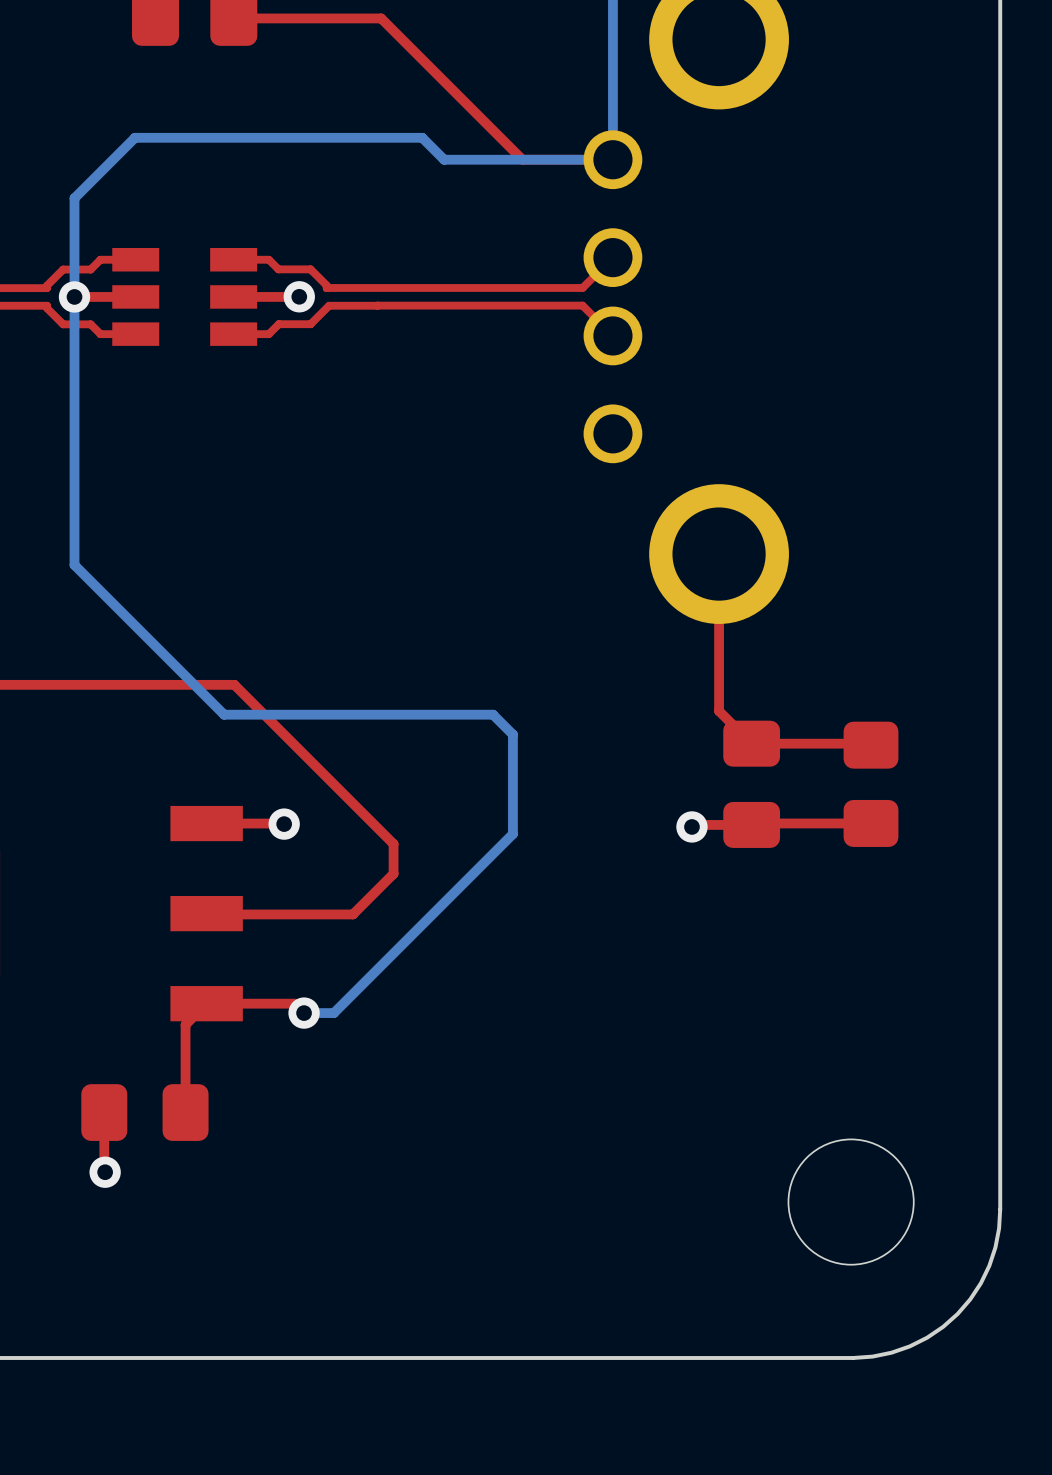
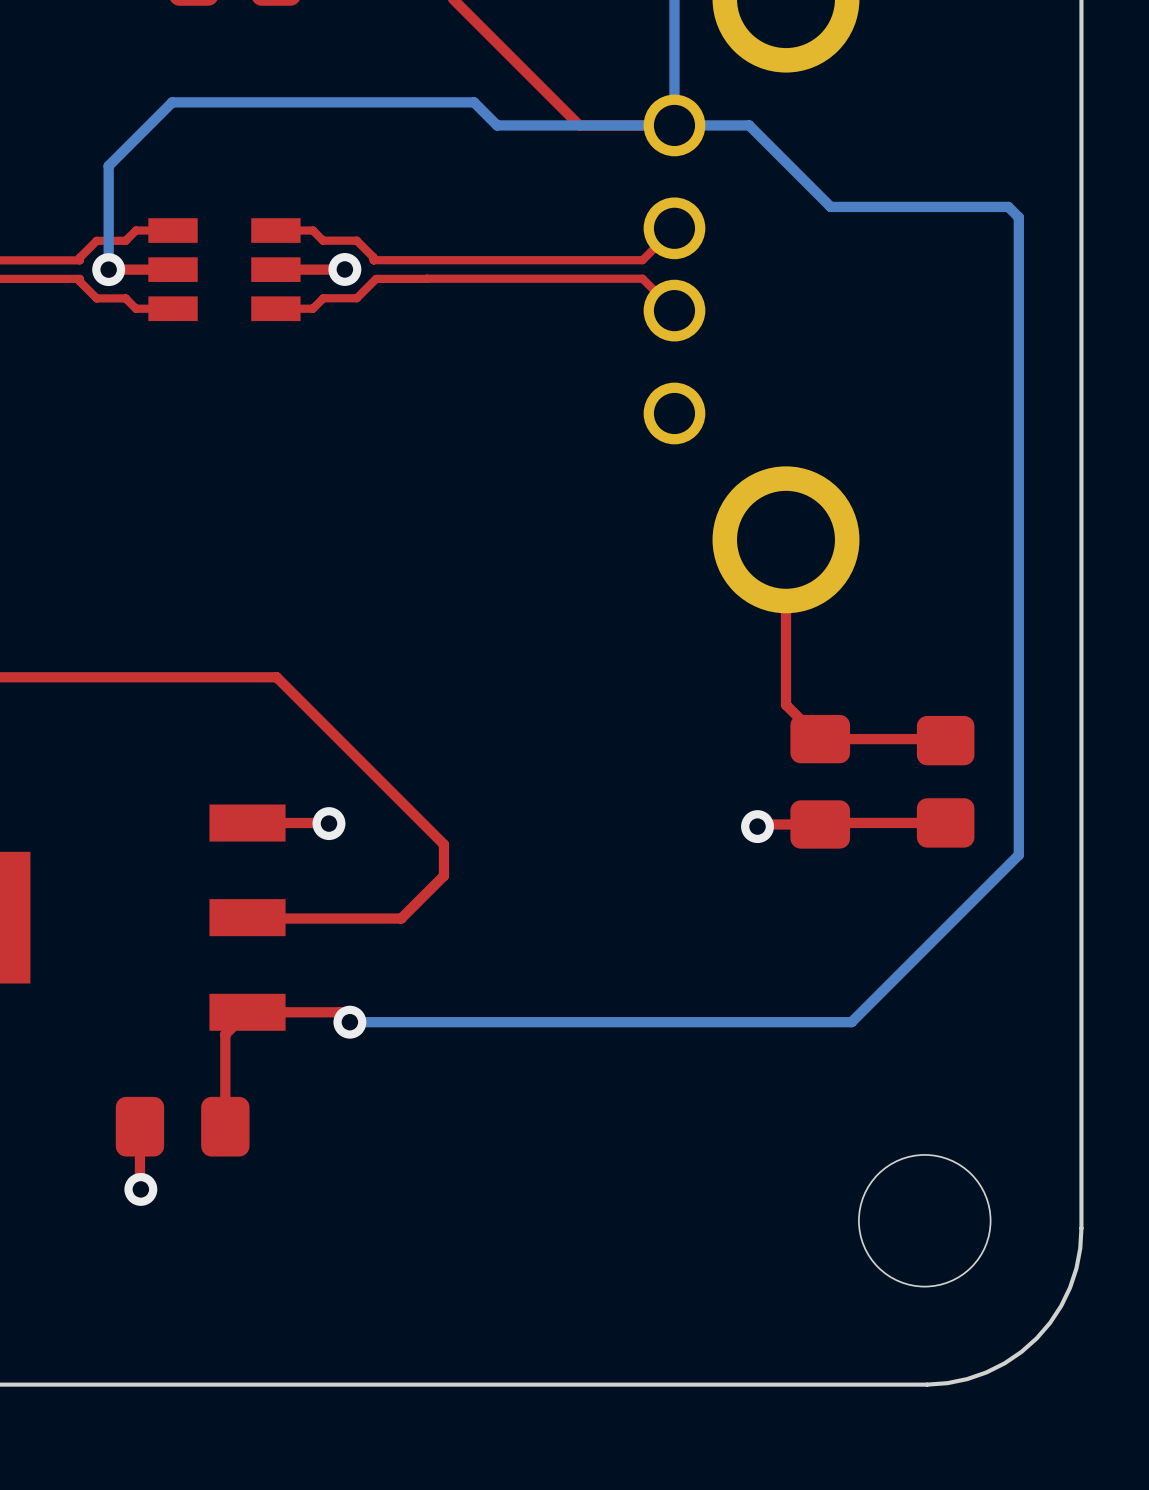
bottom track: (74, 296) (74, 565) (224, 714) (493, 714) (512, 734) (512, 834) (333, 1013) -> (674, 125) (749, 125) (830, 206) (1008, 206) (1018, 217) (1018, 854) (851, 1022) (381, 1022)

